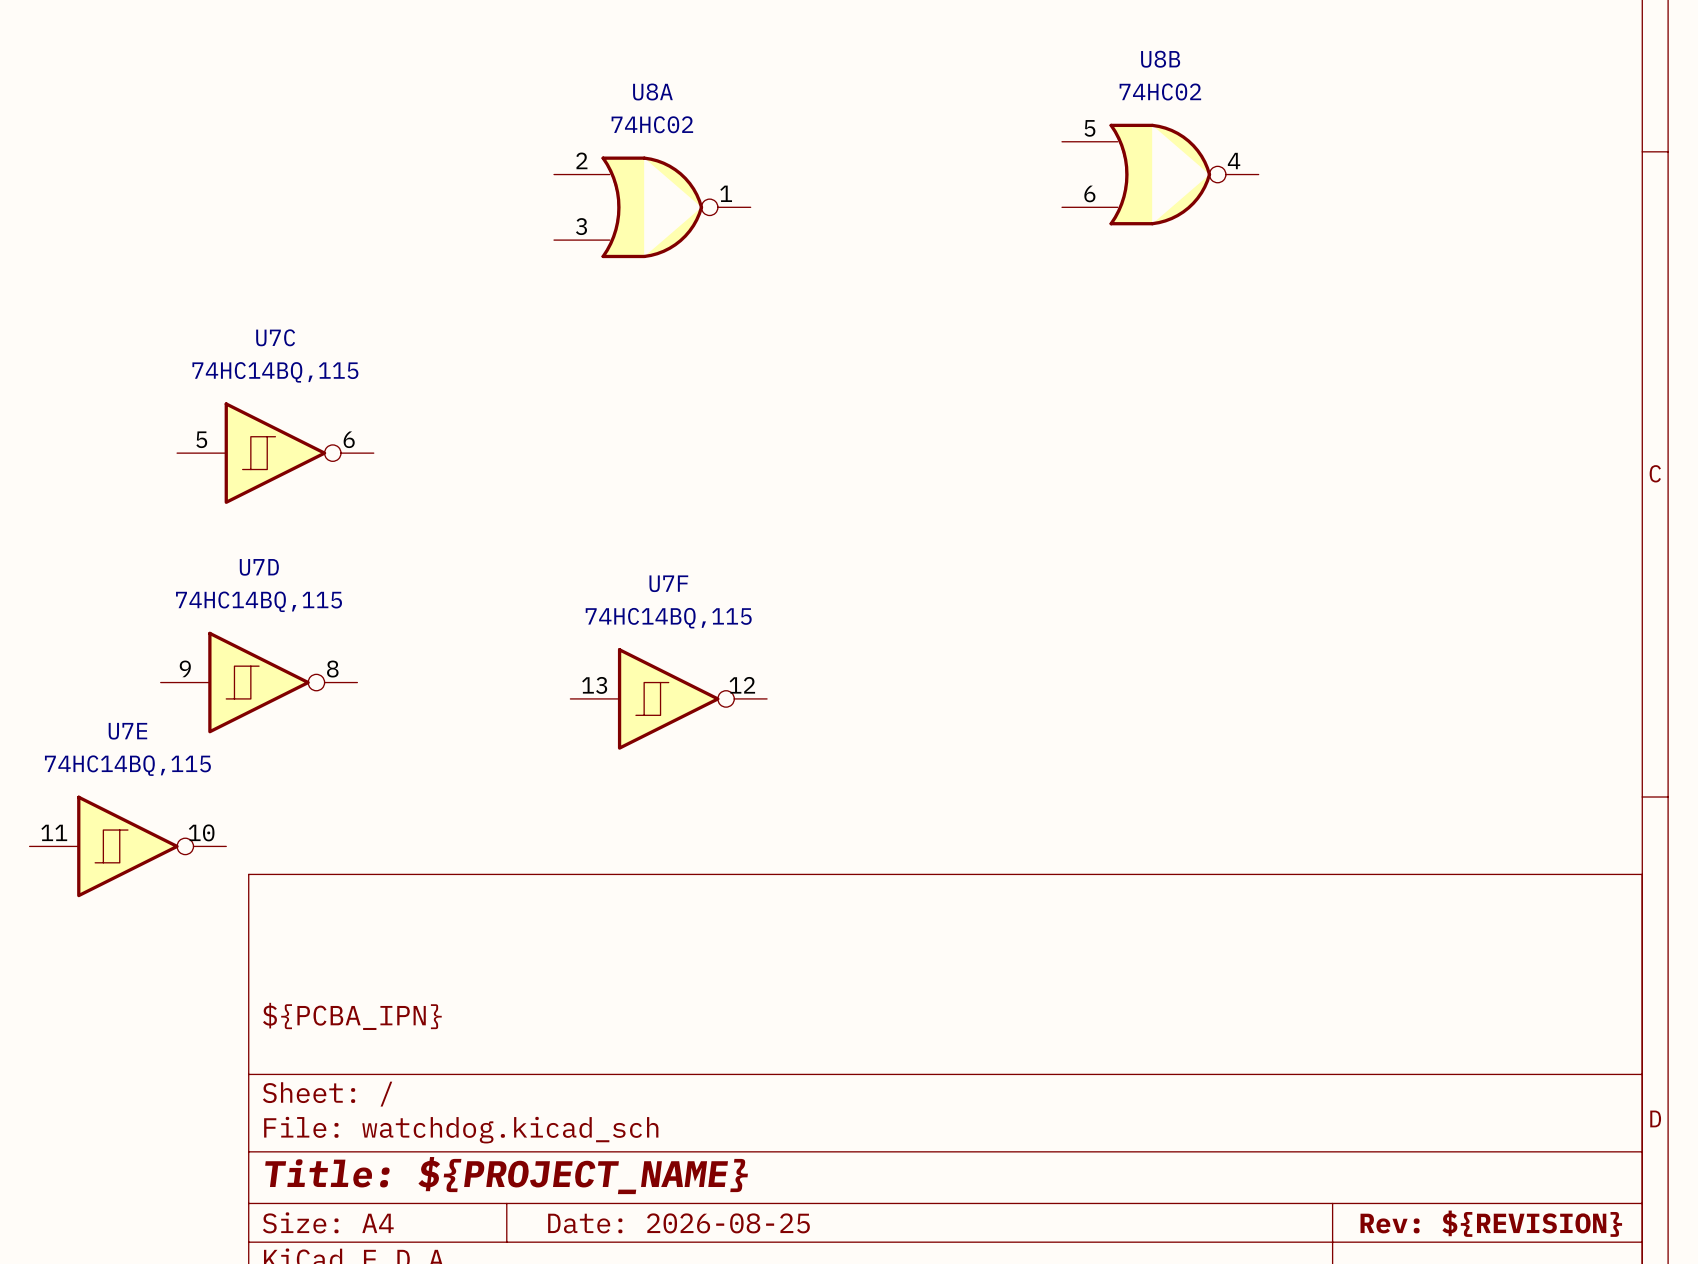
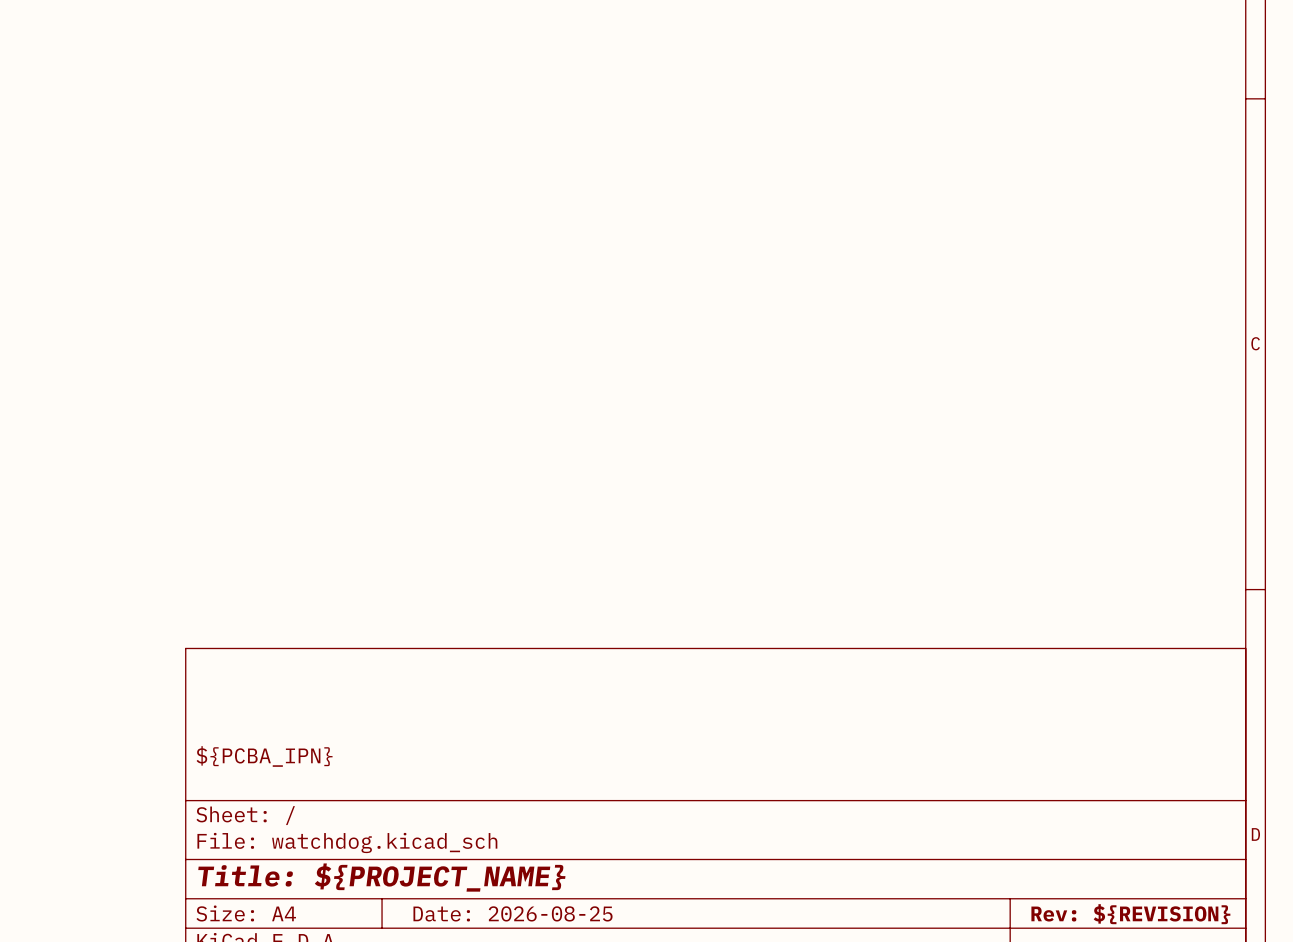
U8B: 74HC02 (1160, 174) -> none
U8A: 74HC02 (652, 207) -> none
U7C: 74HC14BQ,115 (275, 453) -> none
U7D: 74HC14BQ,115 (259, 682) -> none
U7F: 74HC14BQ,115 (668, 698) -> none
U7E: 74HC14BQ,115 (127, 846) -> none

